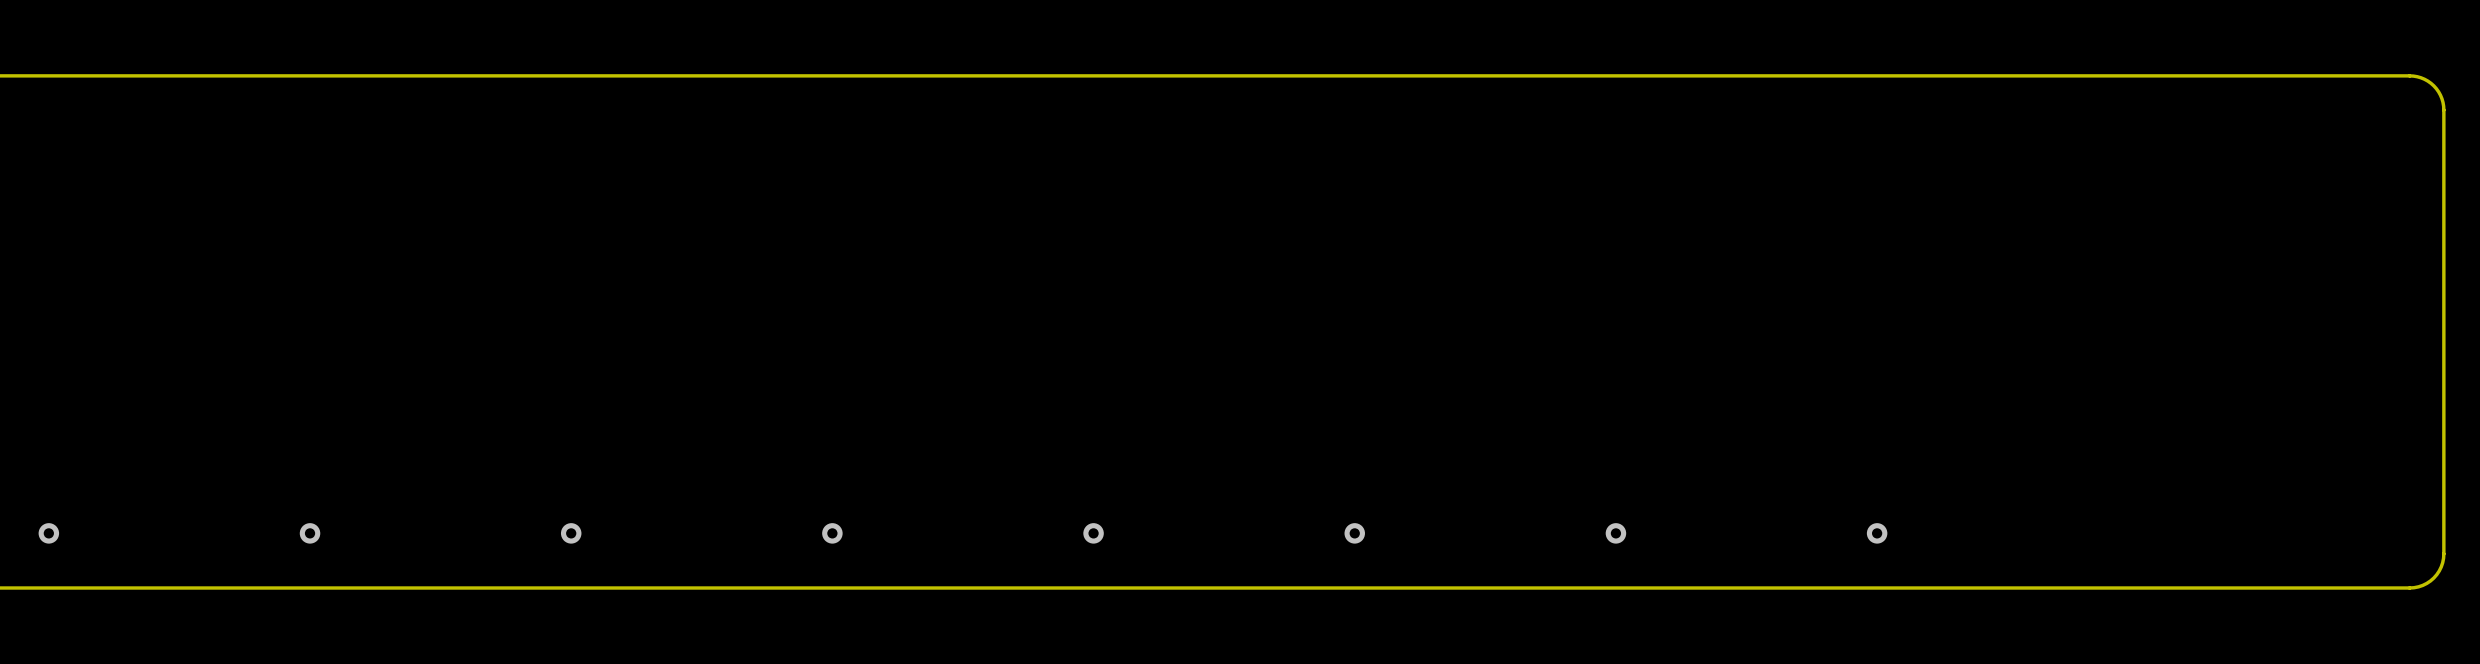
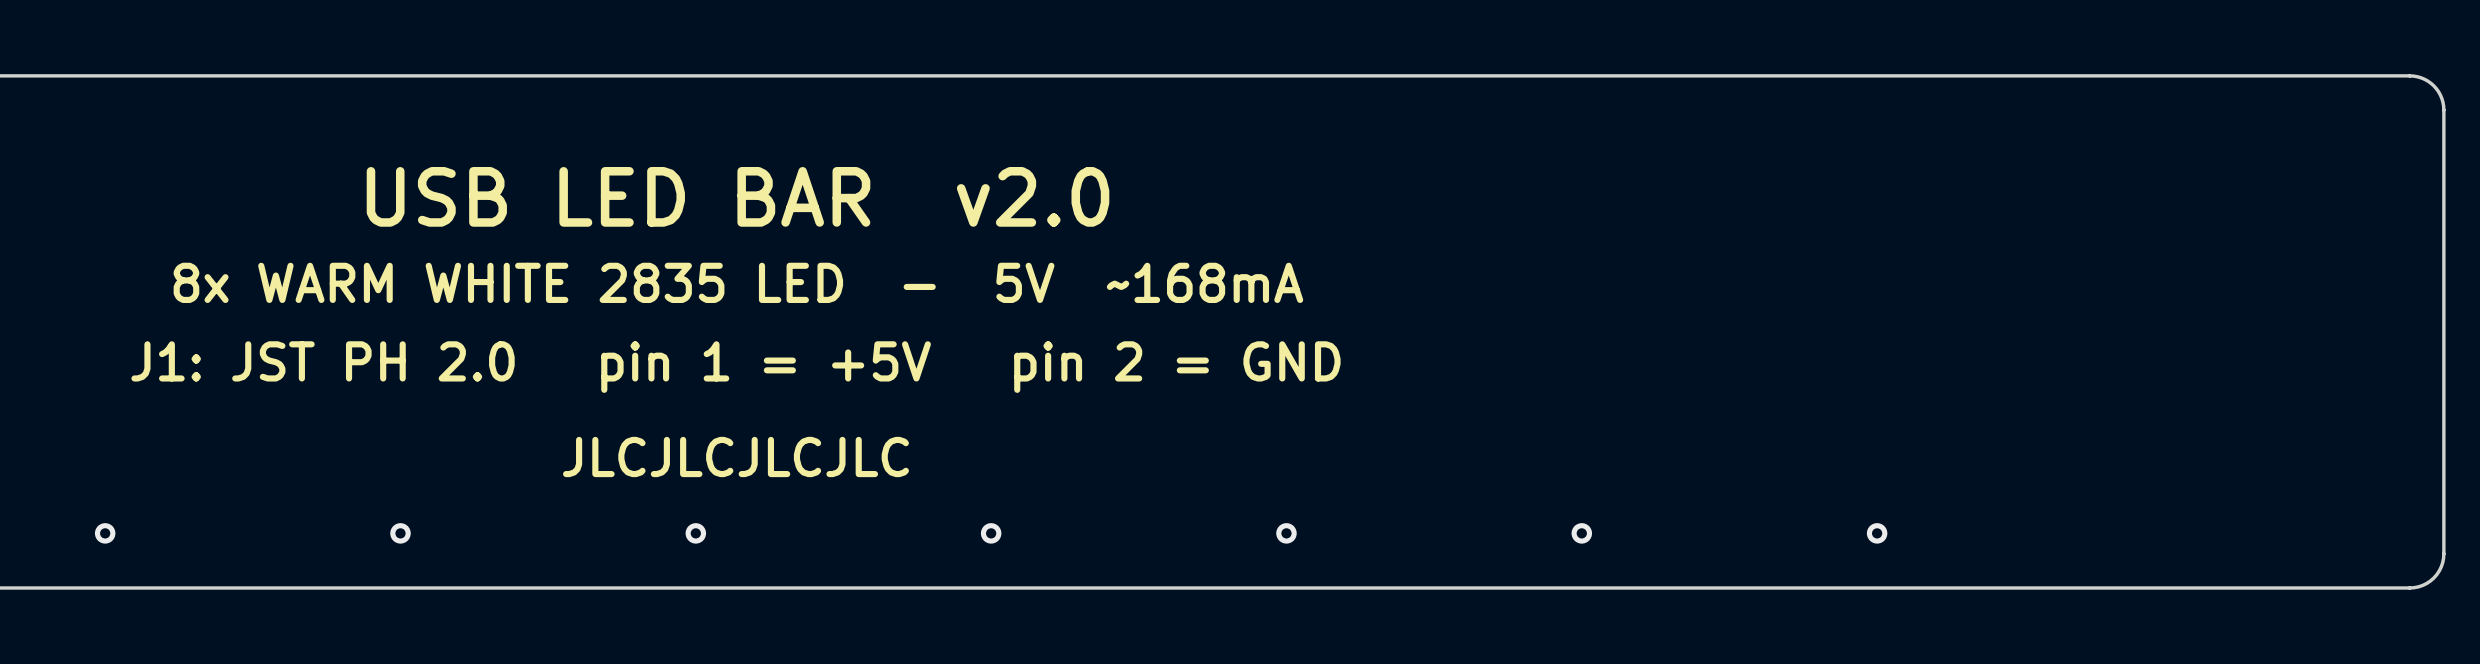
text: none -> USB LED BAR v2.0 (738, 196)
text: none -> 8x WARM WHITE 2835 LED - 5V ~168mA (738, 282)
text: none -> J1: JST PH 2.0 pin 1 = +5V pin 2 = GND (735, 367)
text: none -> JLCJLCJLCJLC (735, 456)
via position: (48, 533) -> (105, 533)
via: (310, 533) -> none
via: none -> (400, 533)
via: (571, 533) -> none
via: none -> (695, 533)
via: (832, 533) -> none
via: none -> (991, 533)
via: (1093, 533) -> none
via position: (1354, 533) -> (1286, 533)
via position: (1615, 533) -> (1581, 533)

